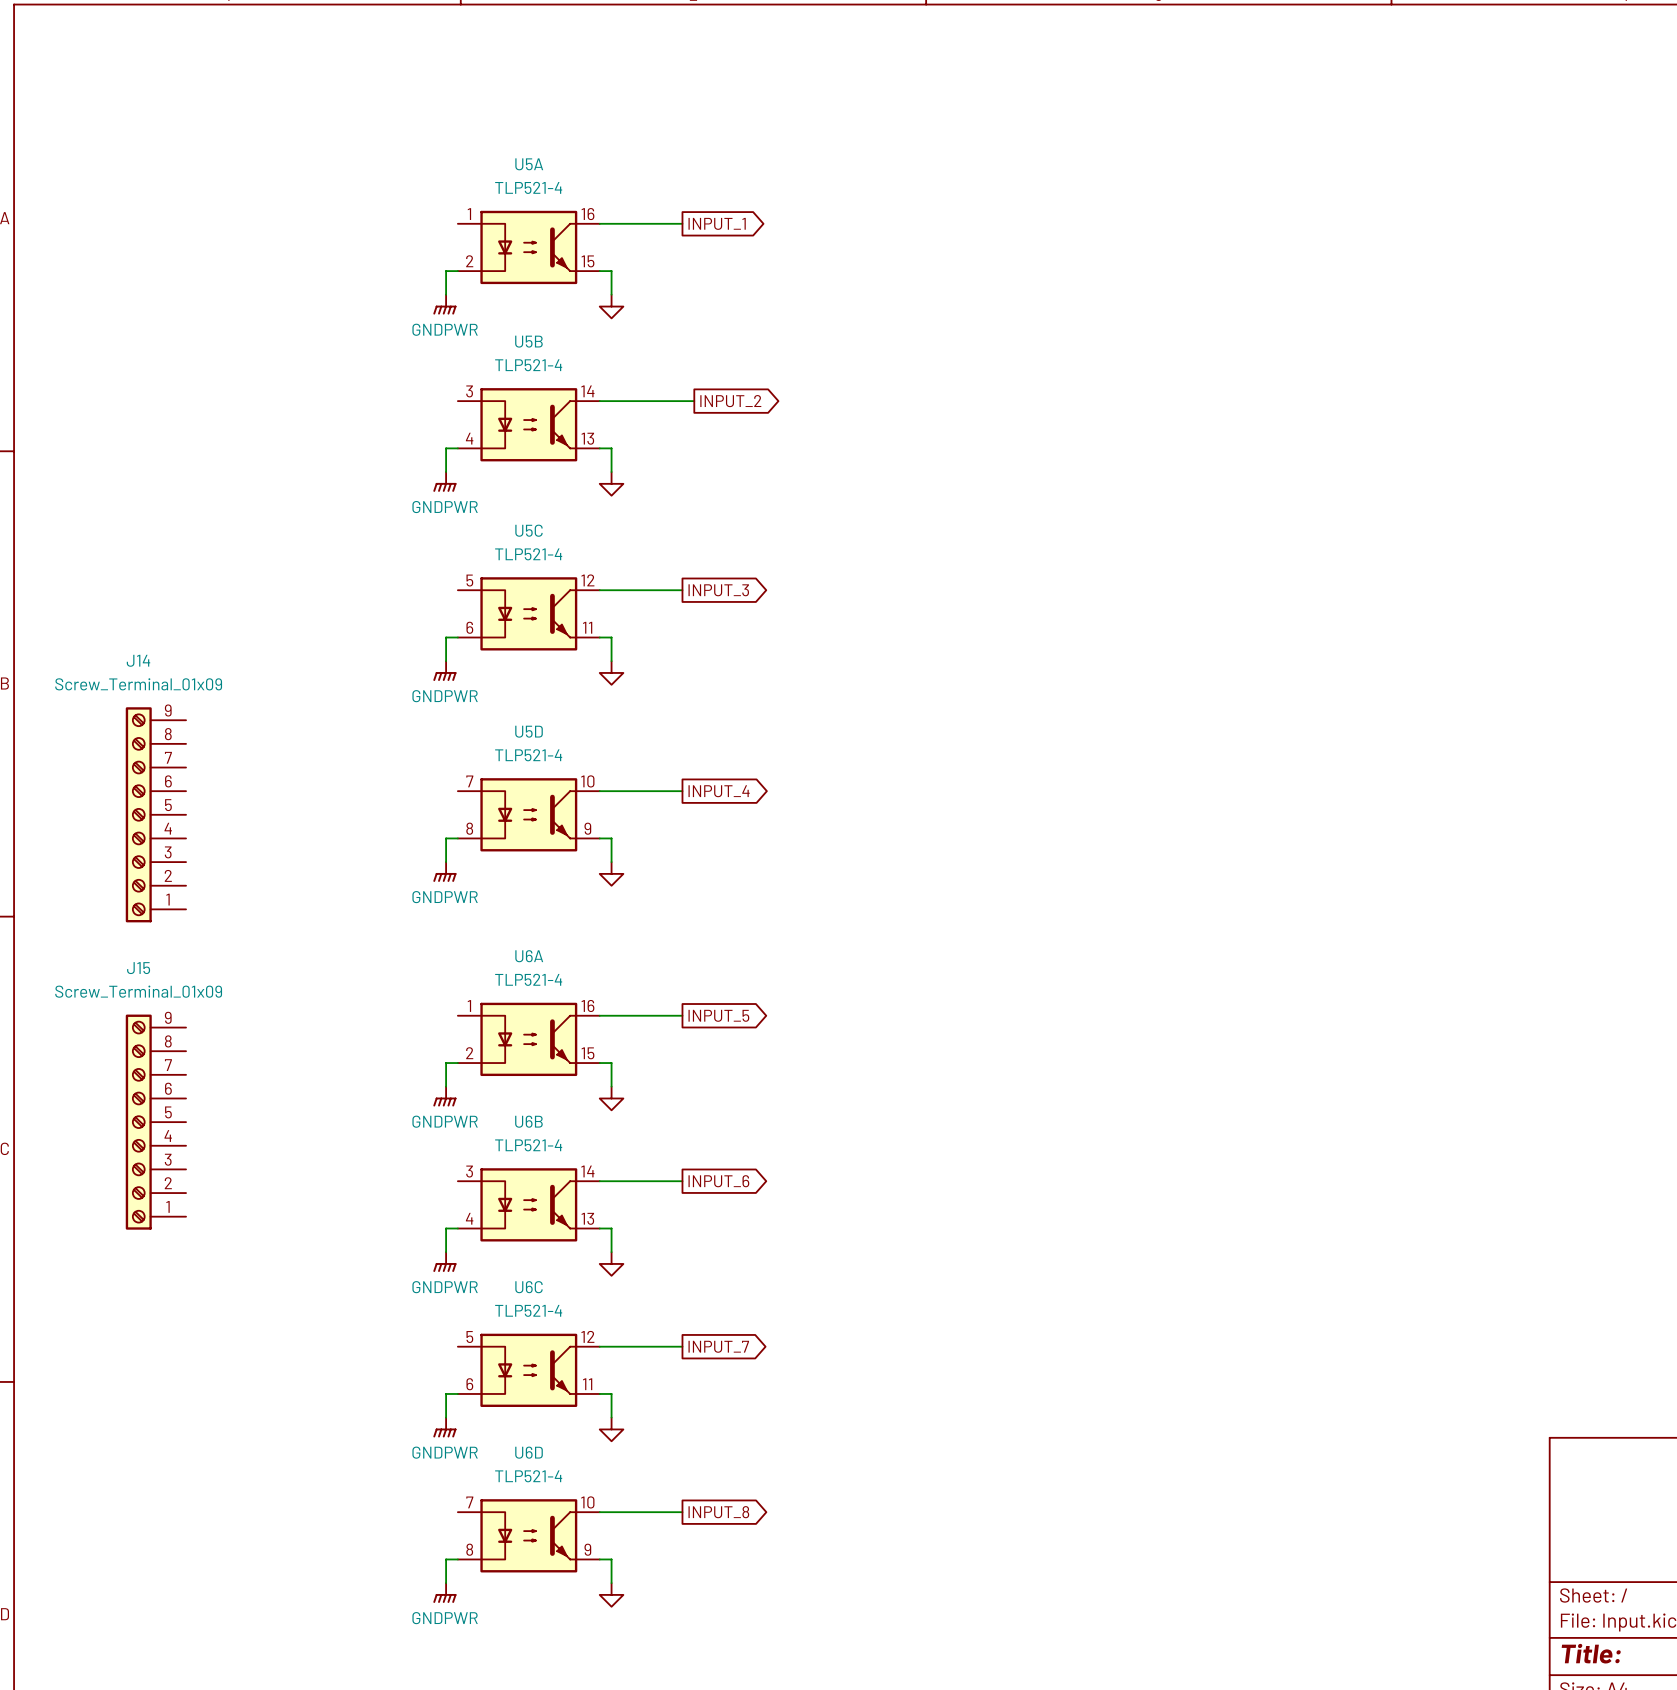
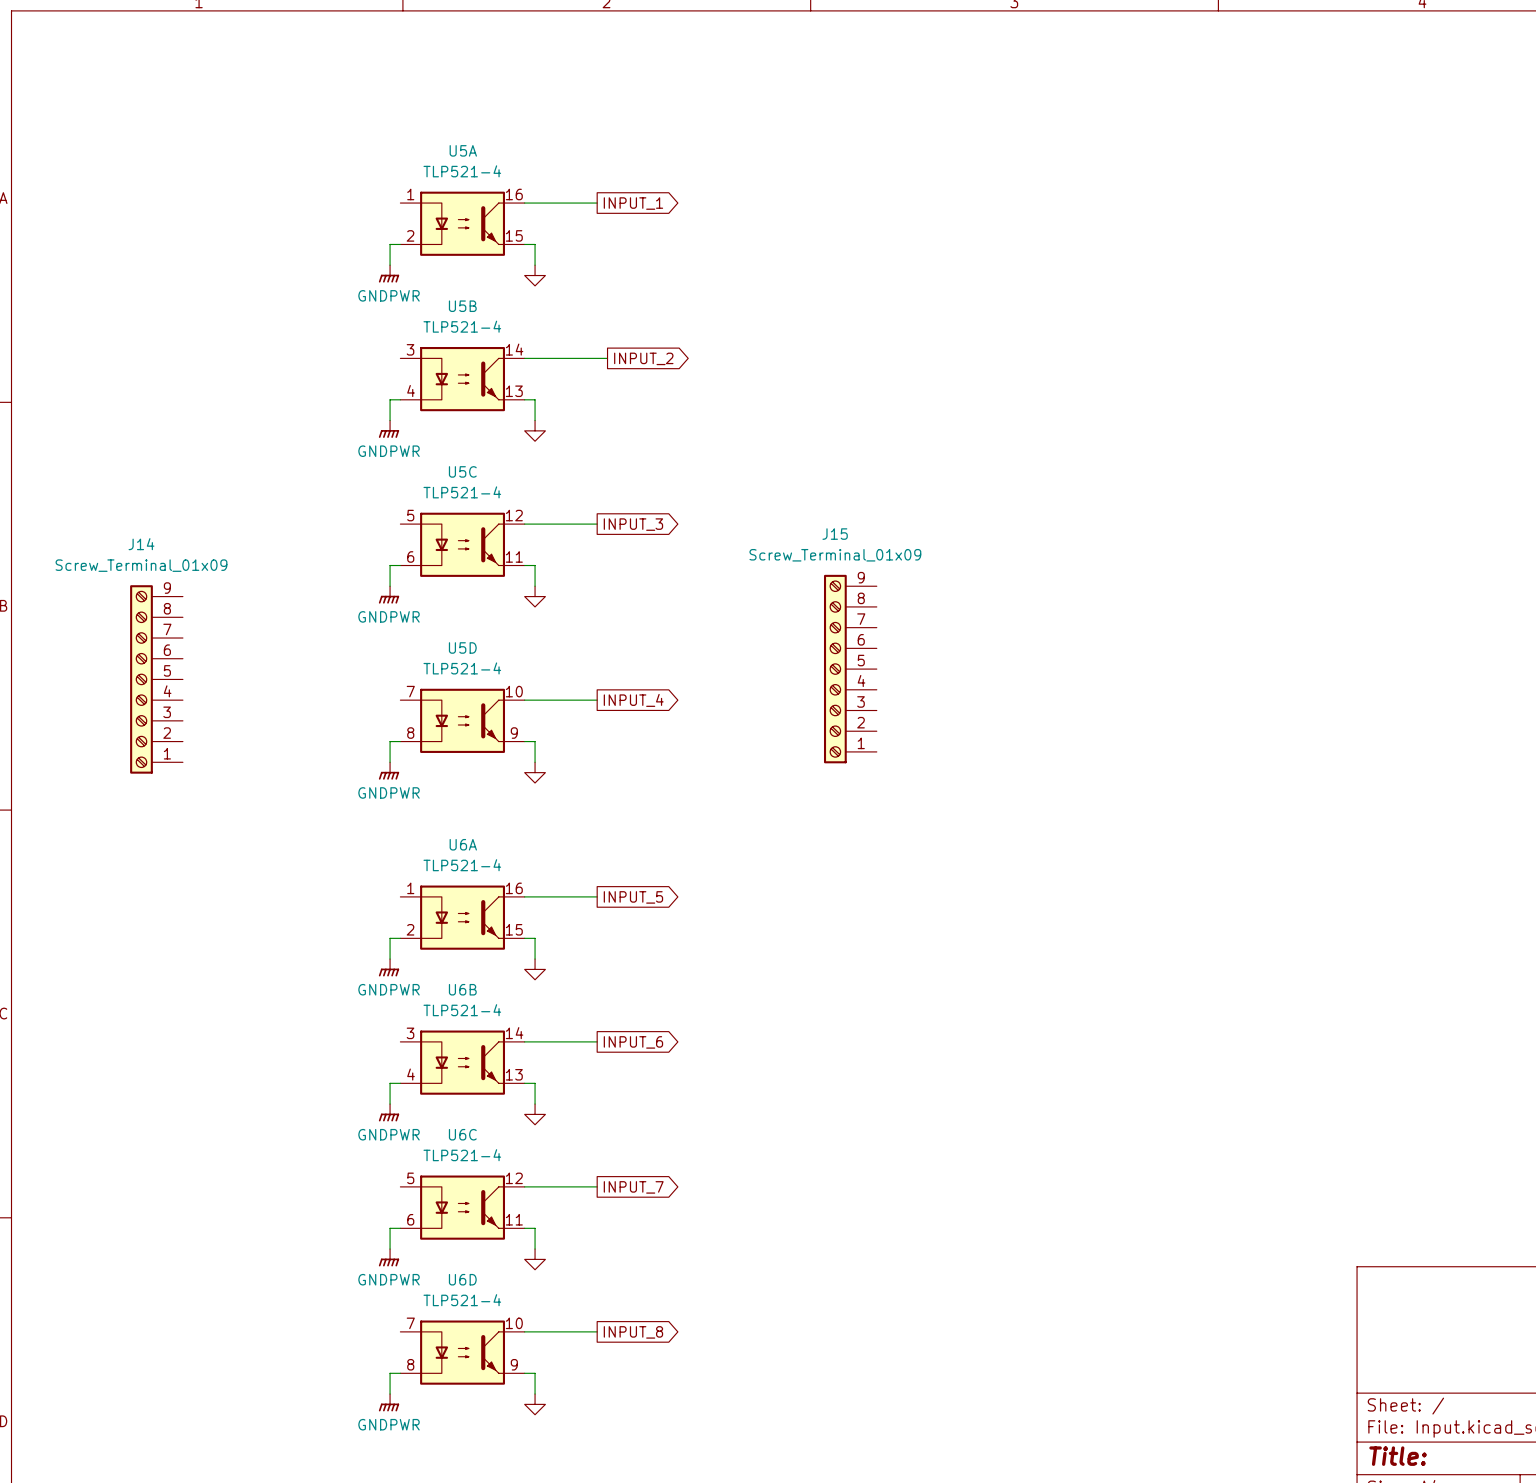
J14 position: (155, 814) -> (156, 679)
J15 position: (155, 1122) -> (850, 669)

